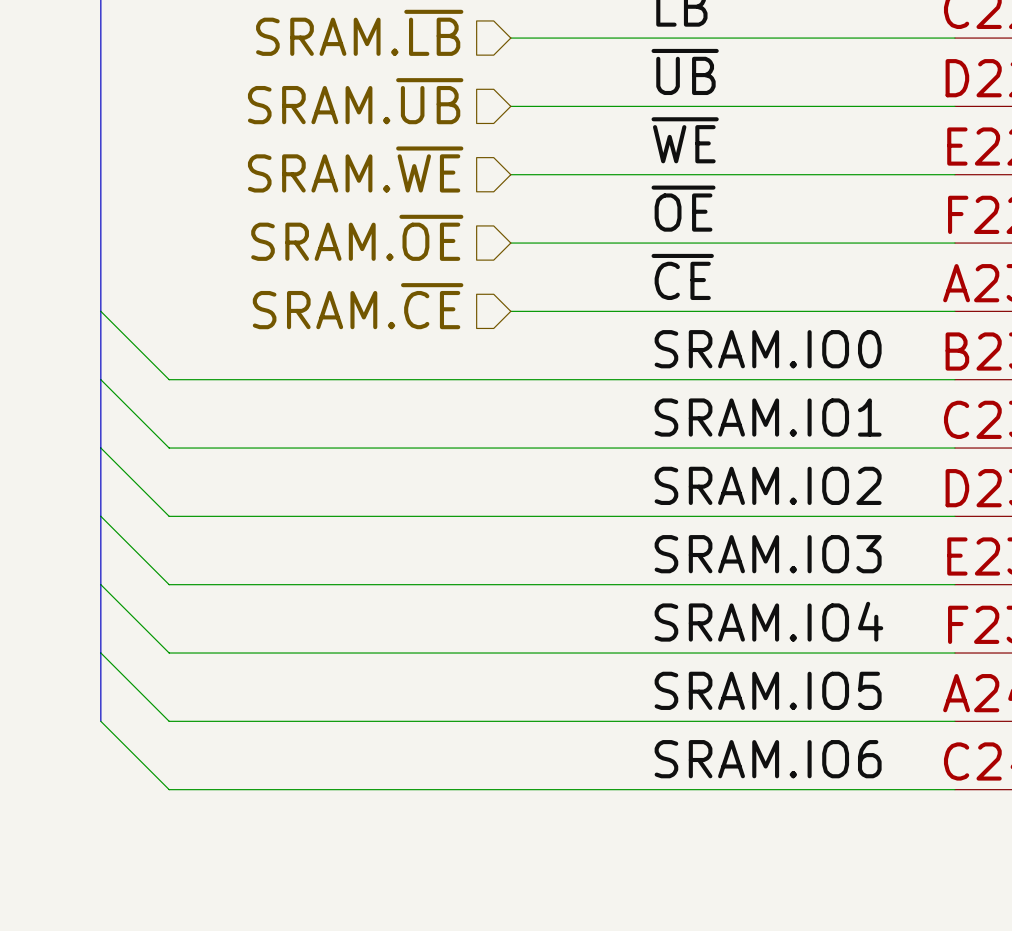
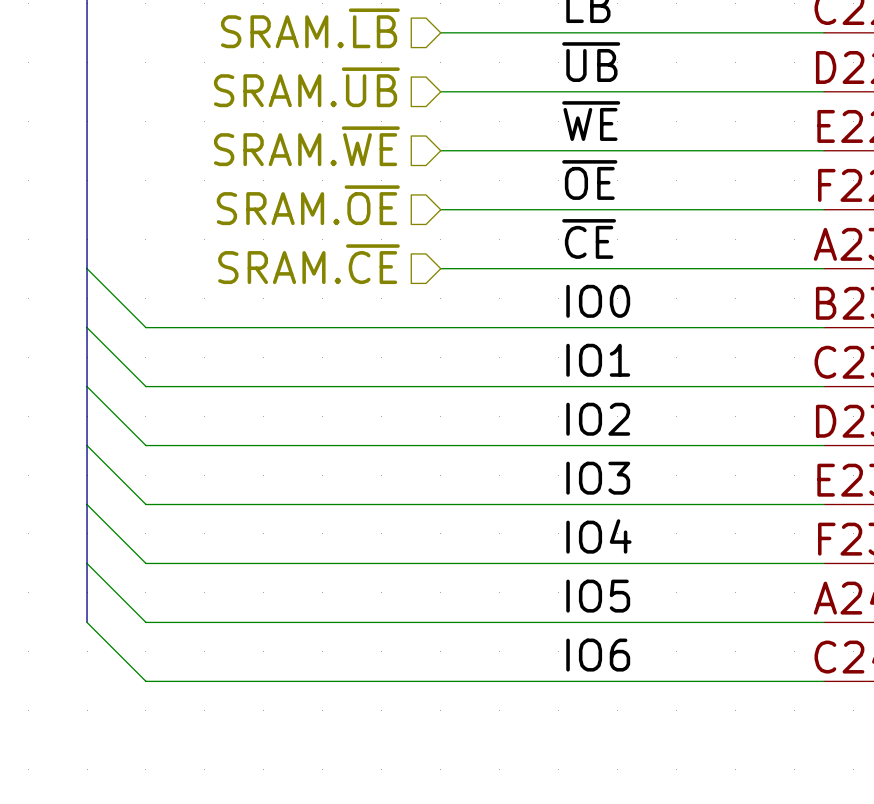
label: SRAM.IO0 (768, 349) -> IO0 (598, 301)
label: SRAM.IO1 (768, 417) -> IO1 (598, 360)
label: SRAM.IO2 (768, 485) -> IO2 (598, 419)
label: SRAM.IO3 (768, 554) -> IO3 (598, 478)
label: SRAM.IO4 (768, 621) -> IO4 (598, 536)
label: SRAM.IO5 (768, 690) -> IO5 (598, 596)
label: SRAM.IO6 (768, 759) -> IO6 (598, 655)

